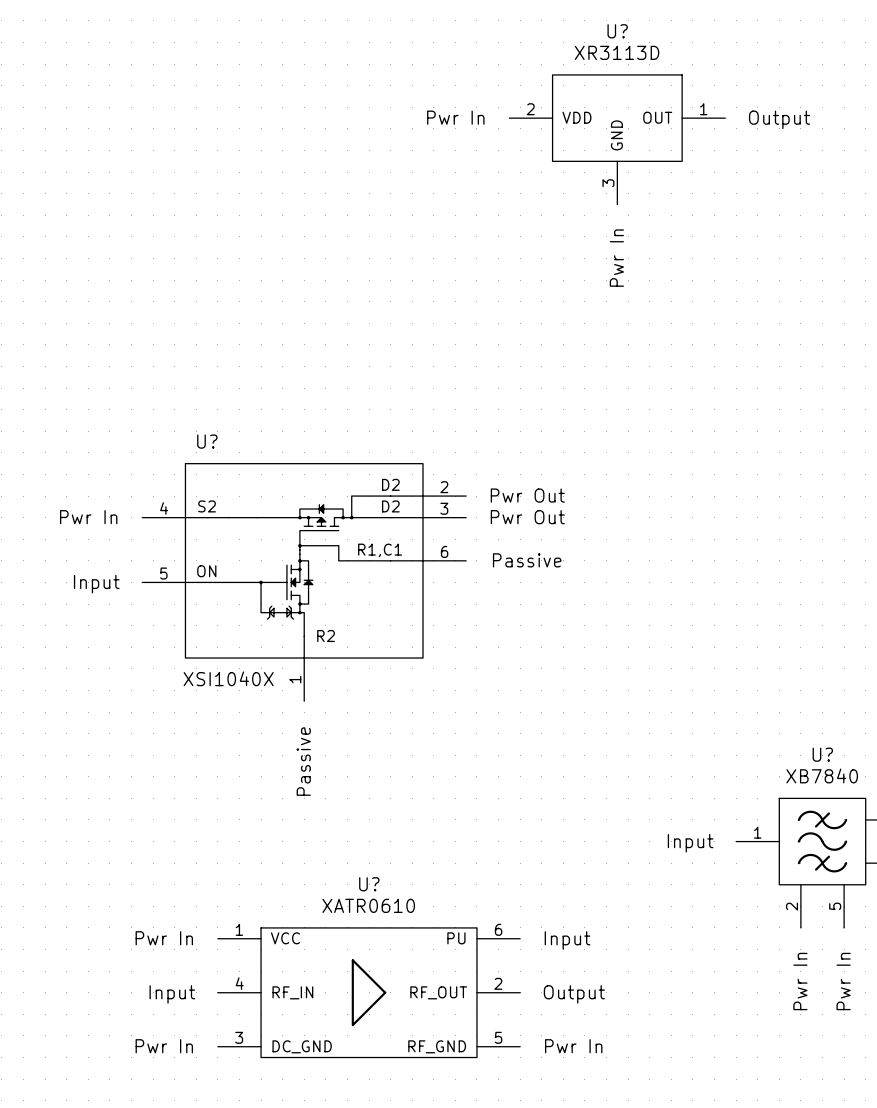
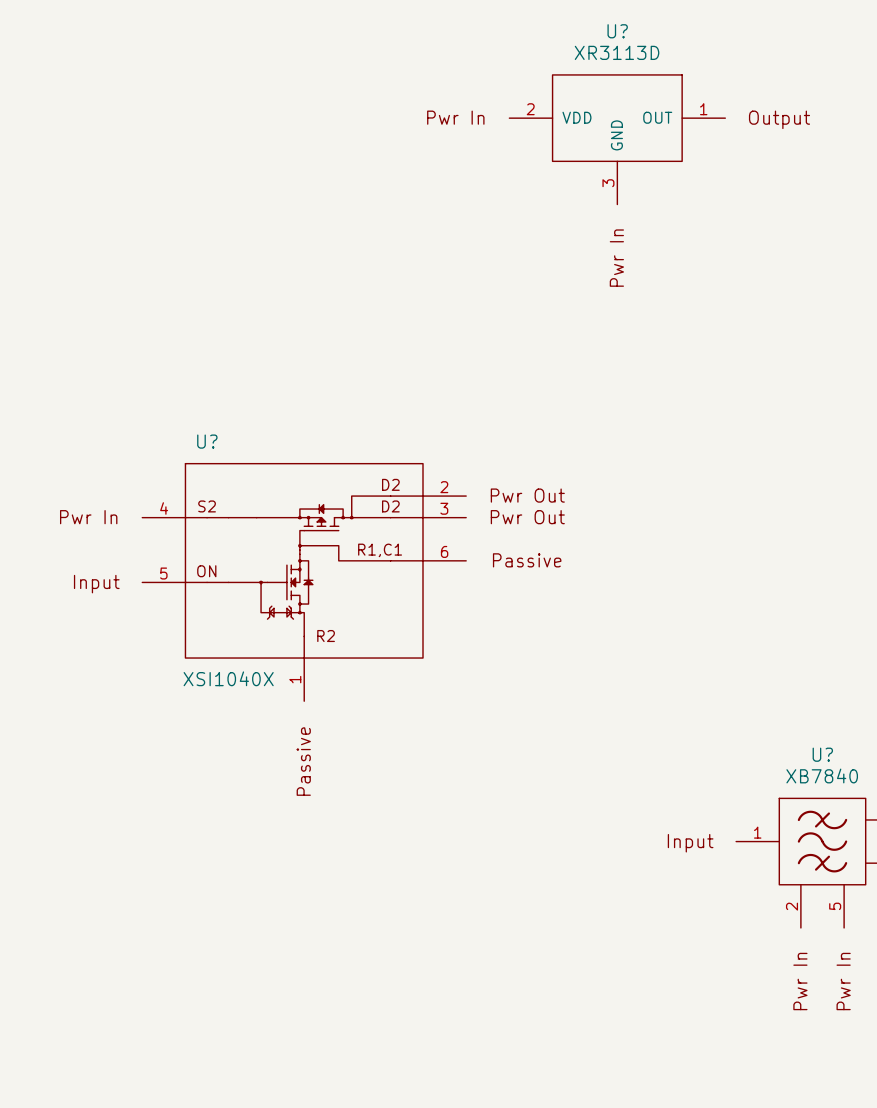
U?: XATR0610 (369, 992) -> none

